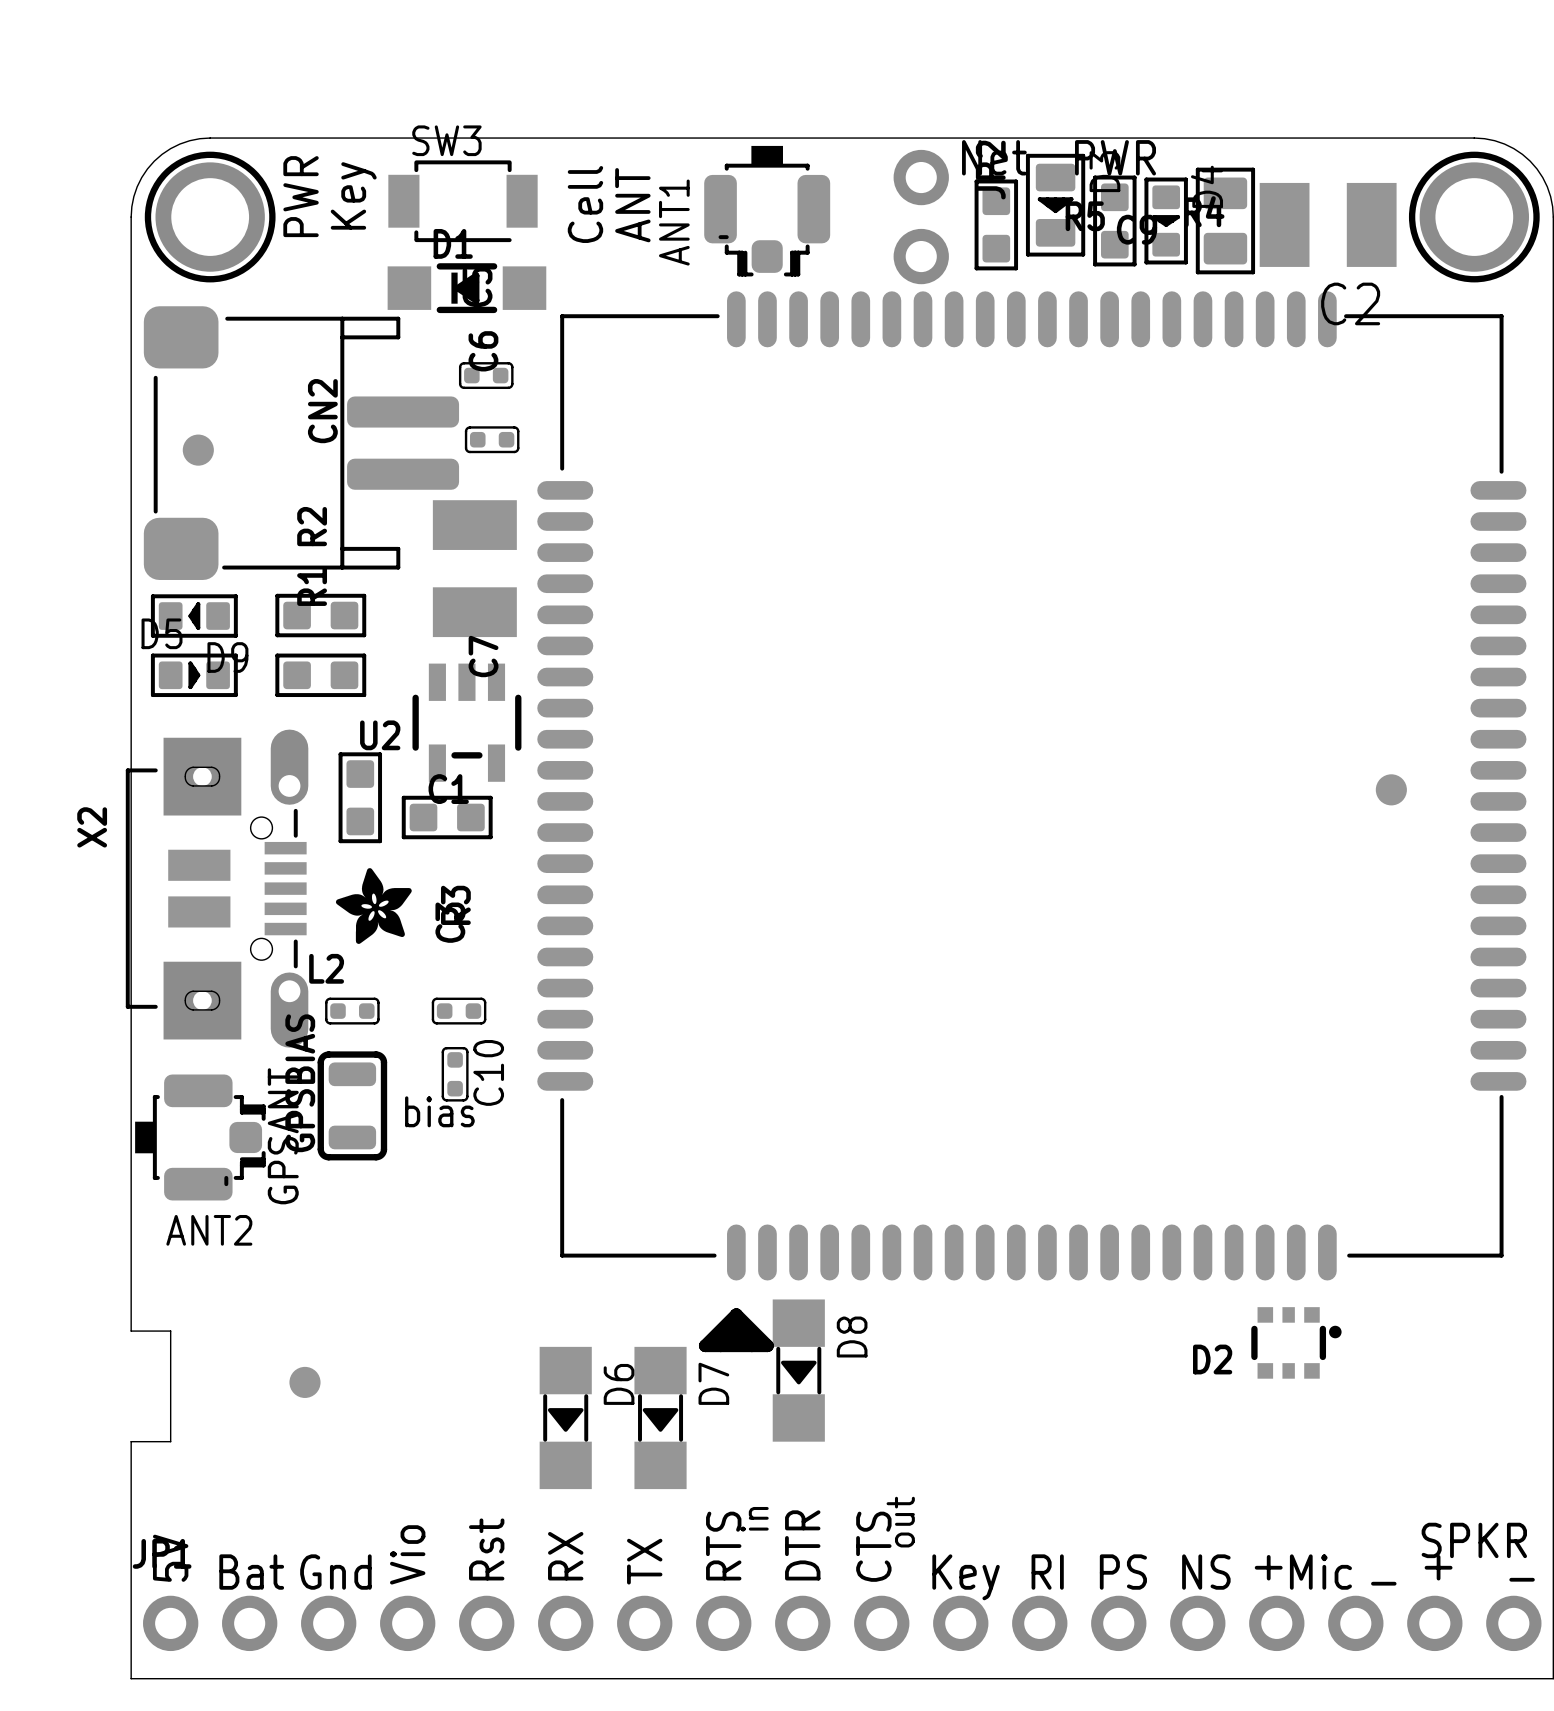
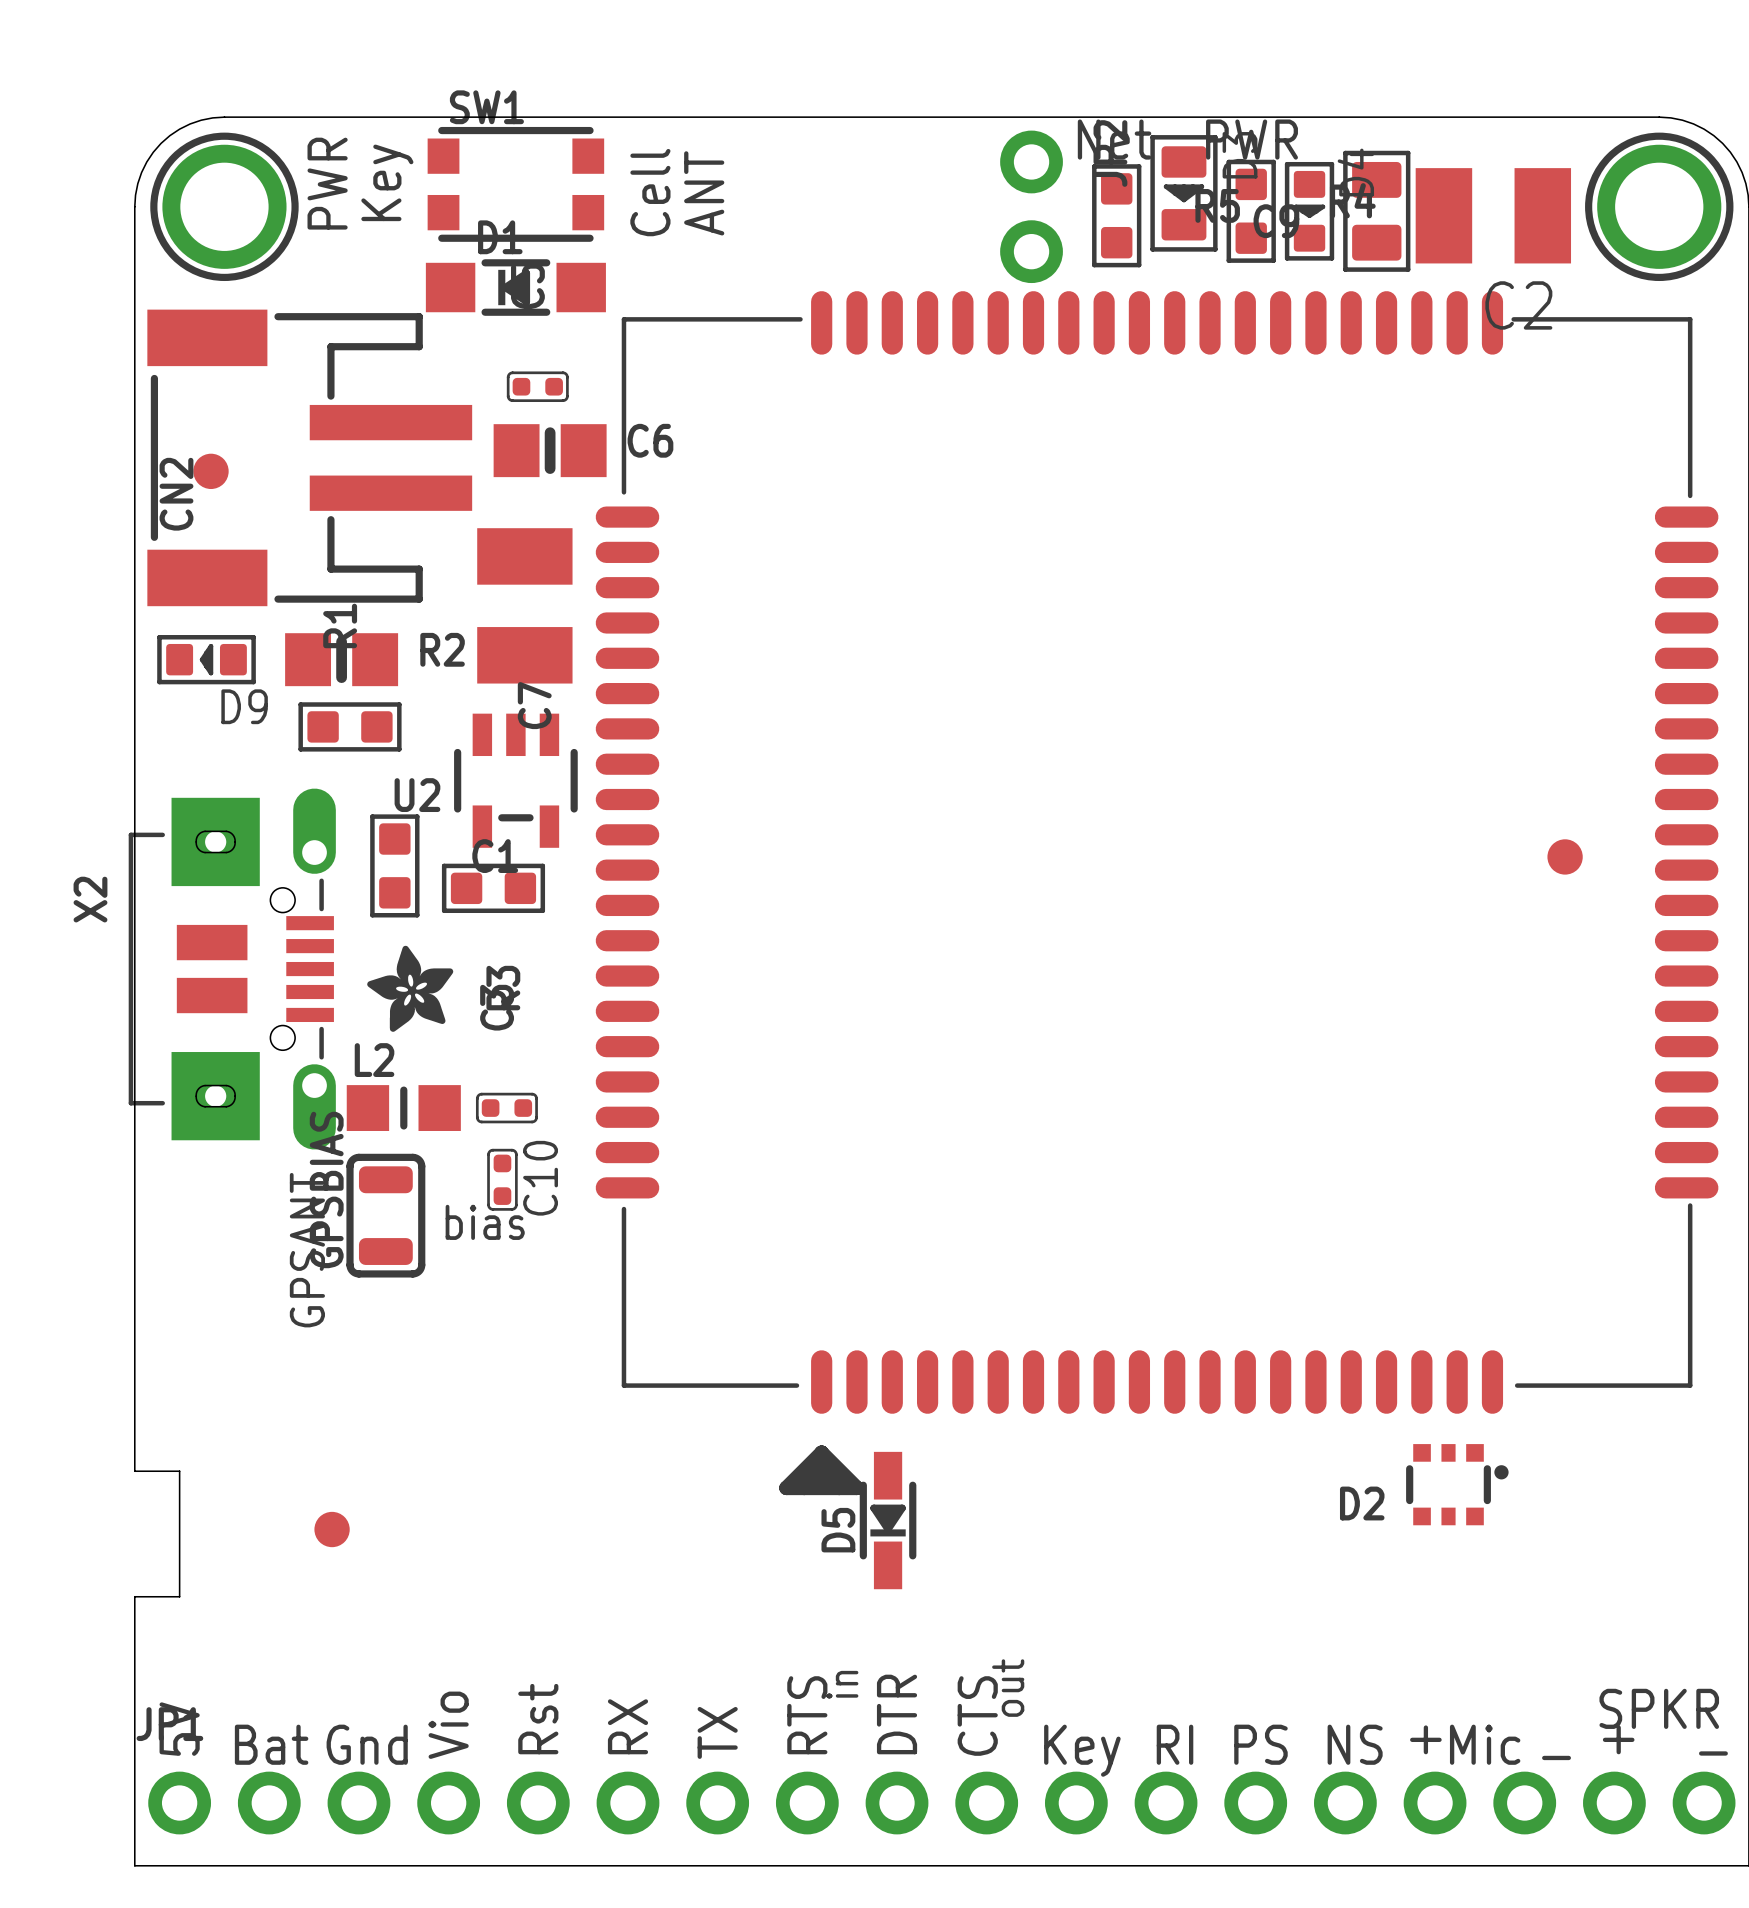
SW1: none -> (515, 184)
SW3: (463, 201) -> none
ANT1: (767, 211) -> none
CN2 footprint: [143, 306, 460, 580] -> [147, 309, 473, 607]
C6 name position: C6 (483, 351) -> C6 (650, 440)
CN2 name position: CN2 (322, 411) -> CN2 (176, 494)
C6 footprint: [464, 426, 520, 454] -> [493, 424, 607, 478]
R2 name position: R2 (312, 526) -> R2 (442, 649)
R2 footprint: [275, 593, 367, 638] -> [285, 633, 399, 687]
D5 footprint: [150, 653, 238, 698] -> [859, 1451, 917, 1590]
L2 footprint: [325, 997, 380, 1025] -> [346, 1085, 461, 1131]
ANT2: (200, 1137) -> none
D8: (798, 1370) -> none
D6: (565, 1417) -> none
D7: (660, 1417) -> none

